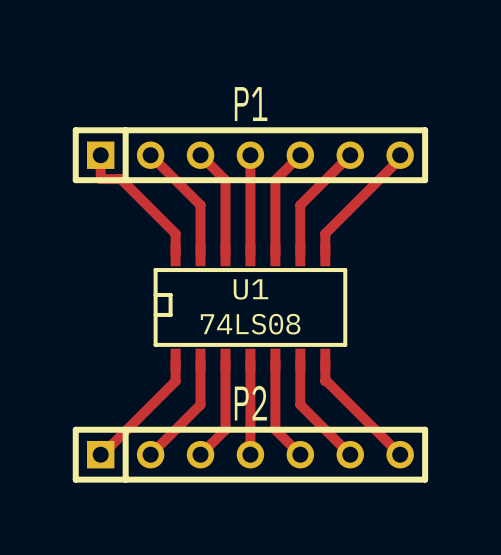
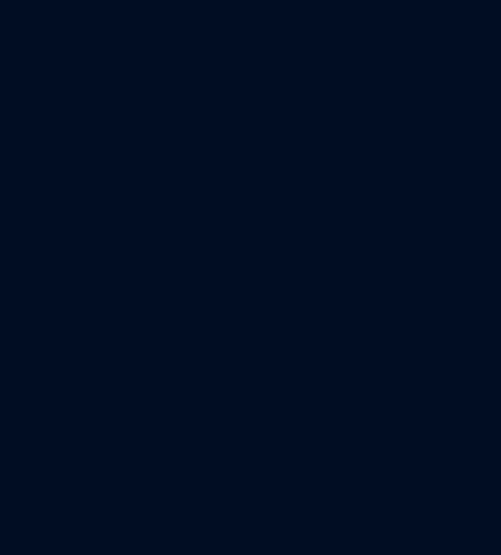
top track: (100, 155) (100, 179) (120, 179) (175, 233) (175, 255) -> none
top track: (150, 155) (200, 205) (200, 255) -> none
top track: (200, 155) (225, 180) (225, 255) -> none
top track: (250, 155) (250, 255) -> none
P1: (250, 155) -> none
top track: (300, 155) (275, 180) (275, 255) -> none
top track: (350, 155) (300, 205) (300, 255) -> none
top track: (400, 155) (400, 158) (325, 233) (325, 255) -> none
U1: 74LS08 (250, 307) -> none
top track: (175, 359) (175, 381) (99, 457) (100, 454) -> none
top track: (200, 359) (200, 404) (150, 454) -> none
top track: (225, 359) (225, 429) (200, 454) -> none
top track: (250, 359) (250, 454) -> none
top track: (275, 359) (275, 429) (300, 454) -> none
top track: (300, 359) (300, 404) (350, 454) -> none
top track: (325, 359) (325, 381) (400, 454) -> none
P2: (250, 454) -> none

